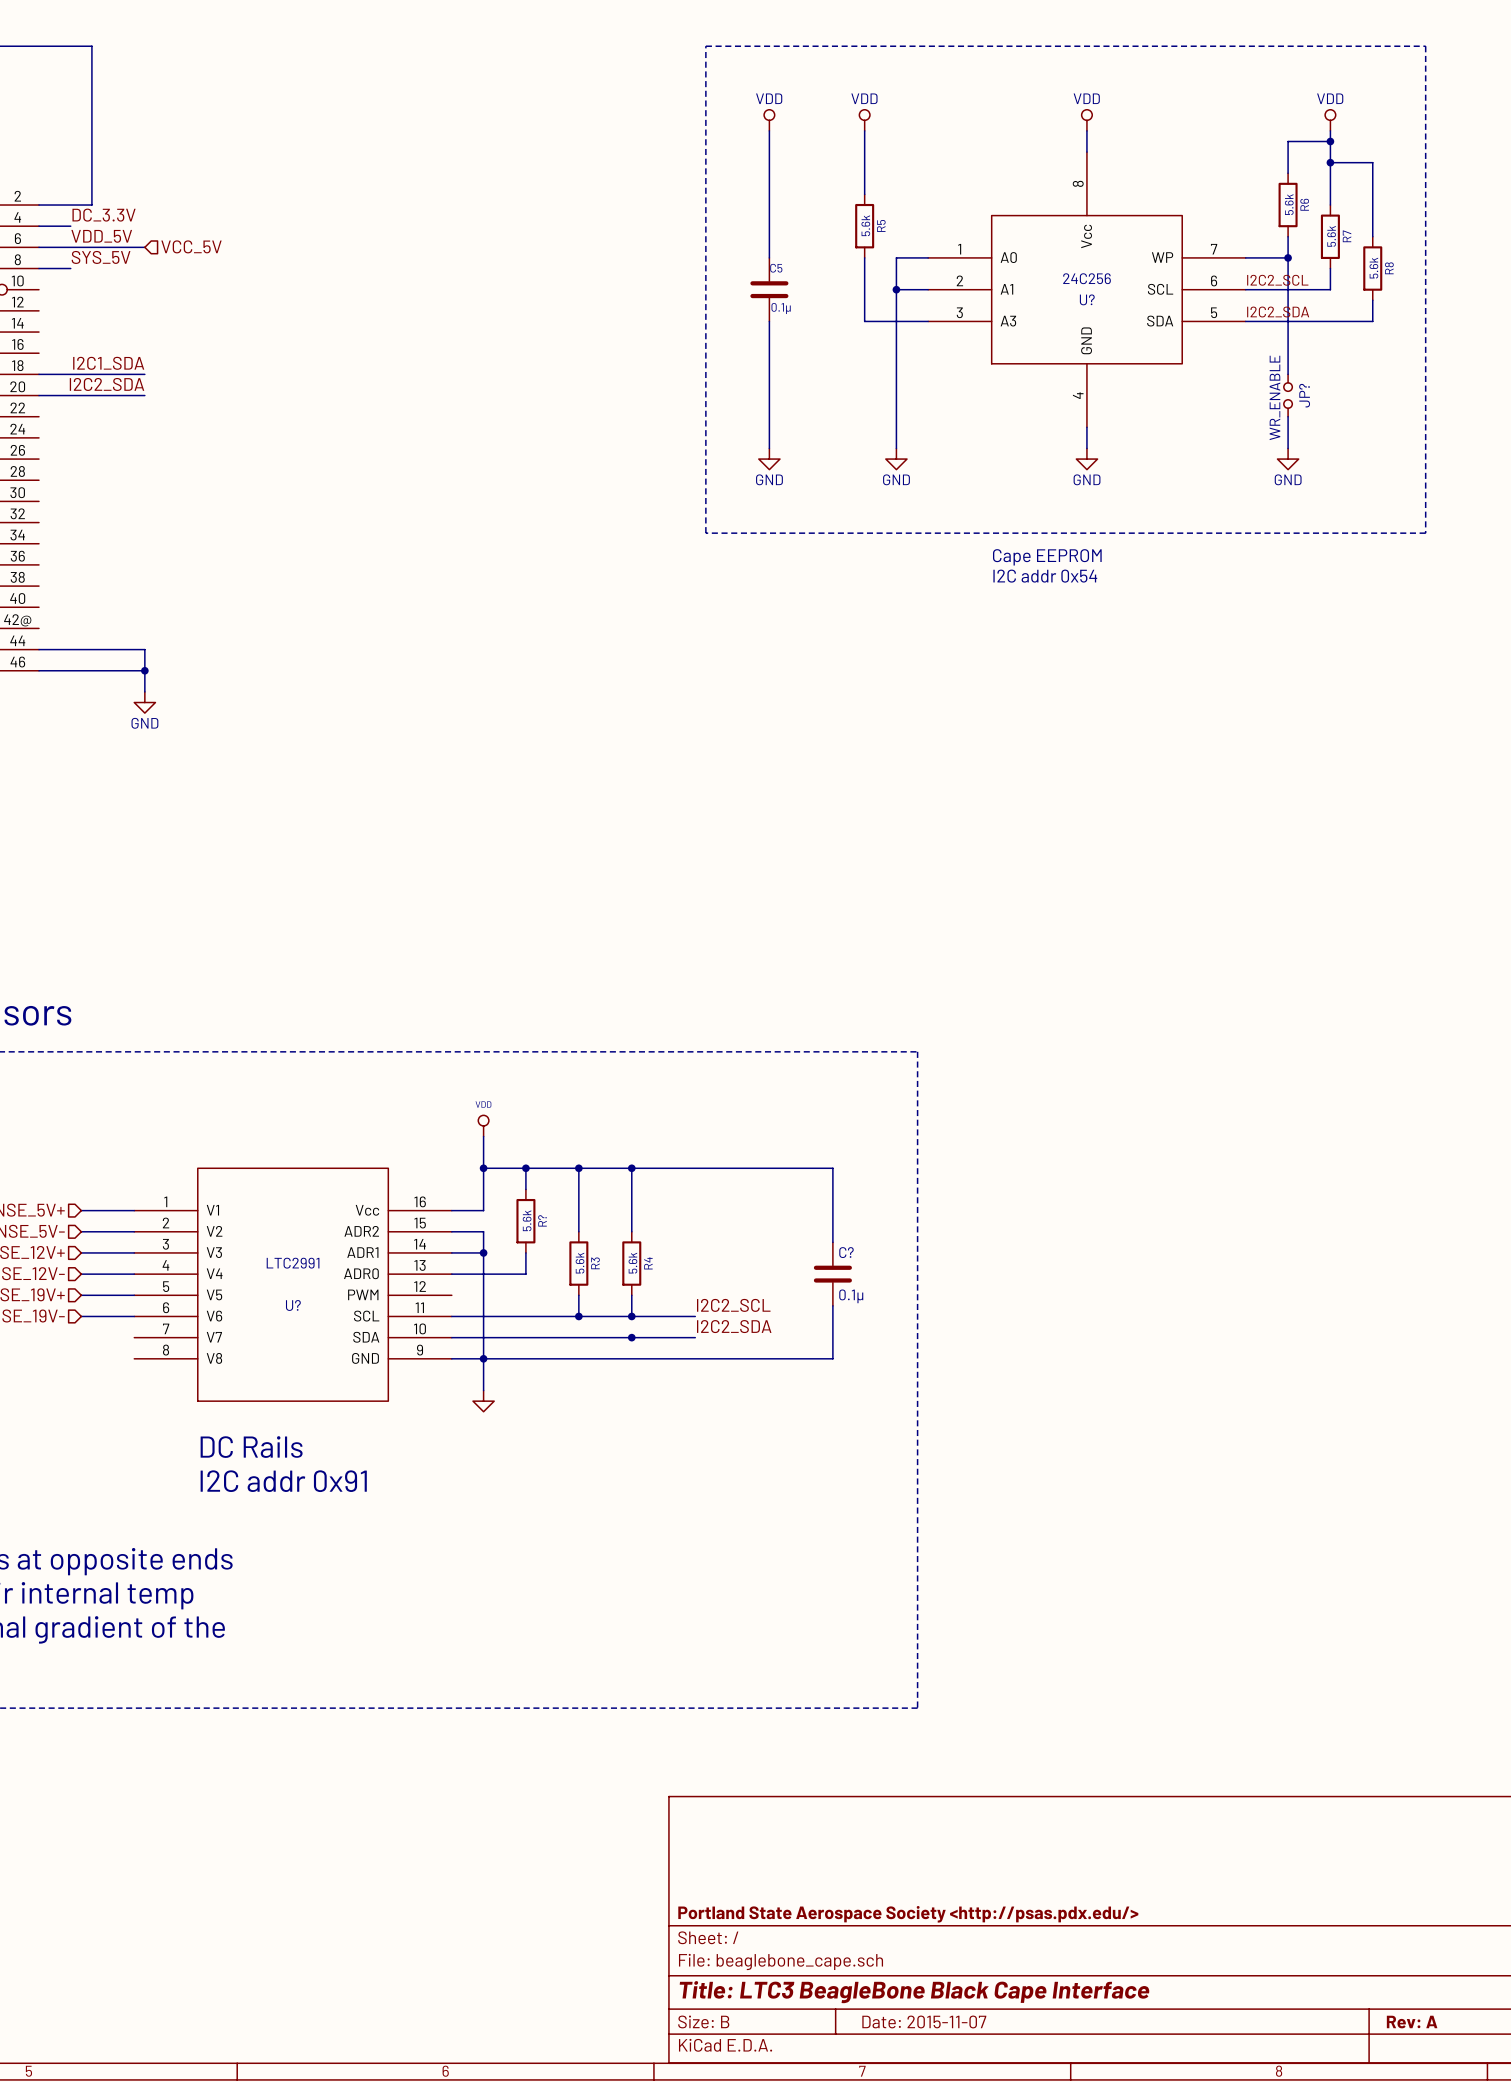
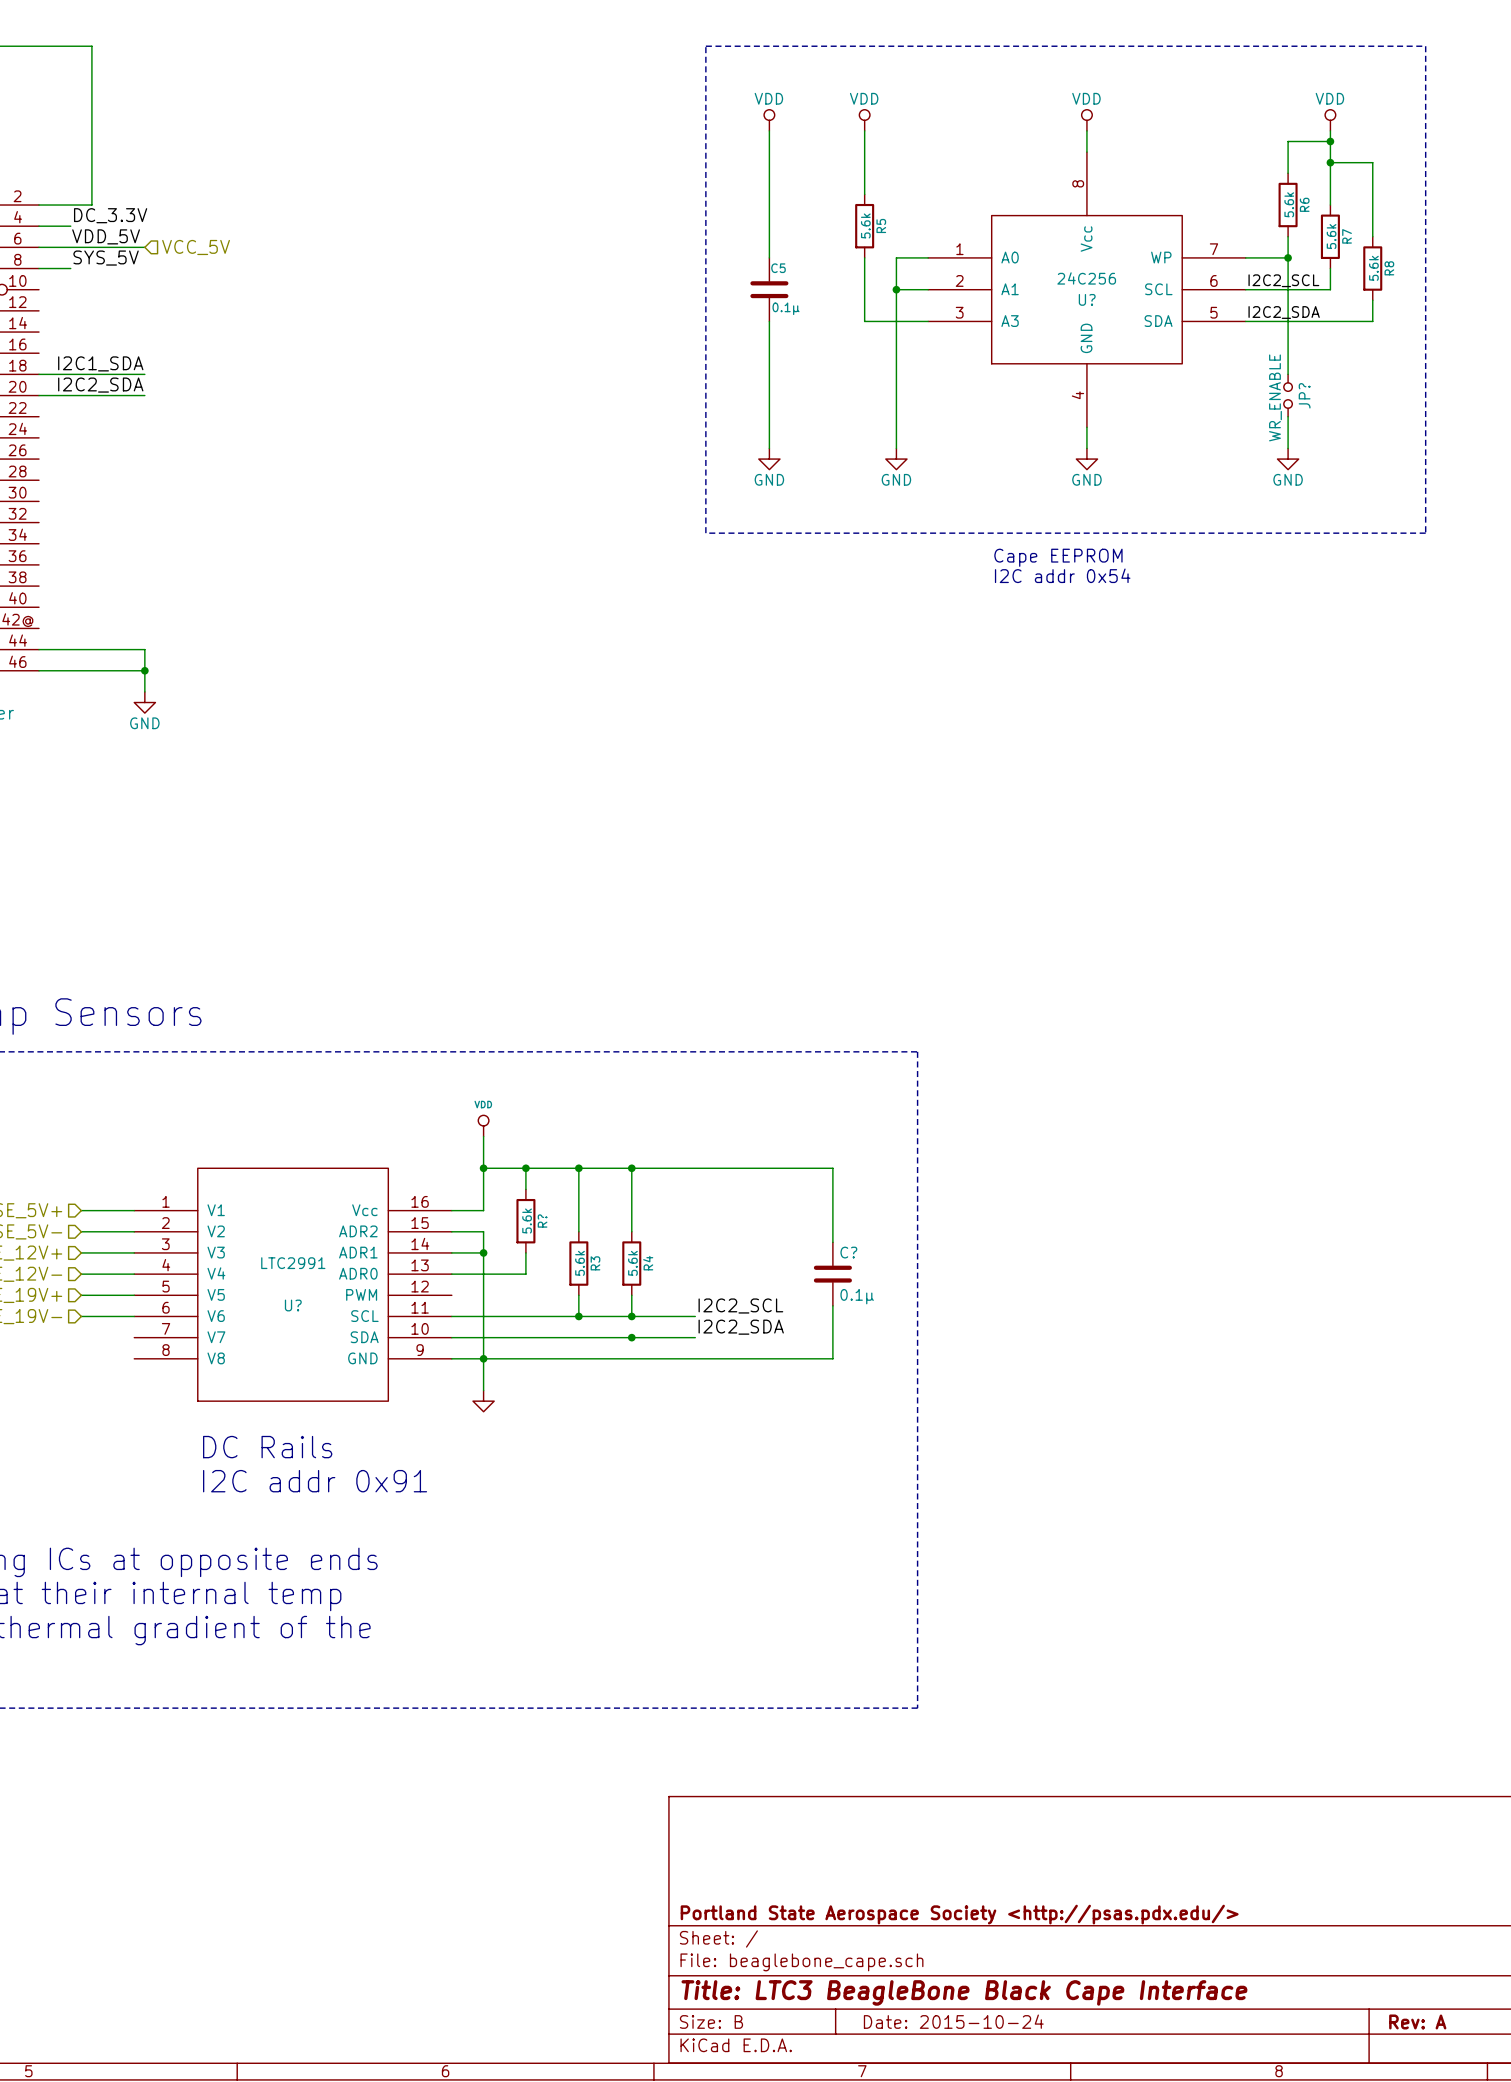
title block: Date: 2015-11-07 (924, 2021) -> Date: 2015-10-24 (953, 2021)

